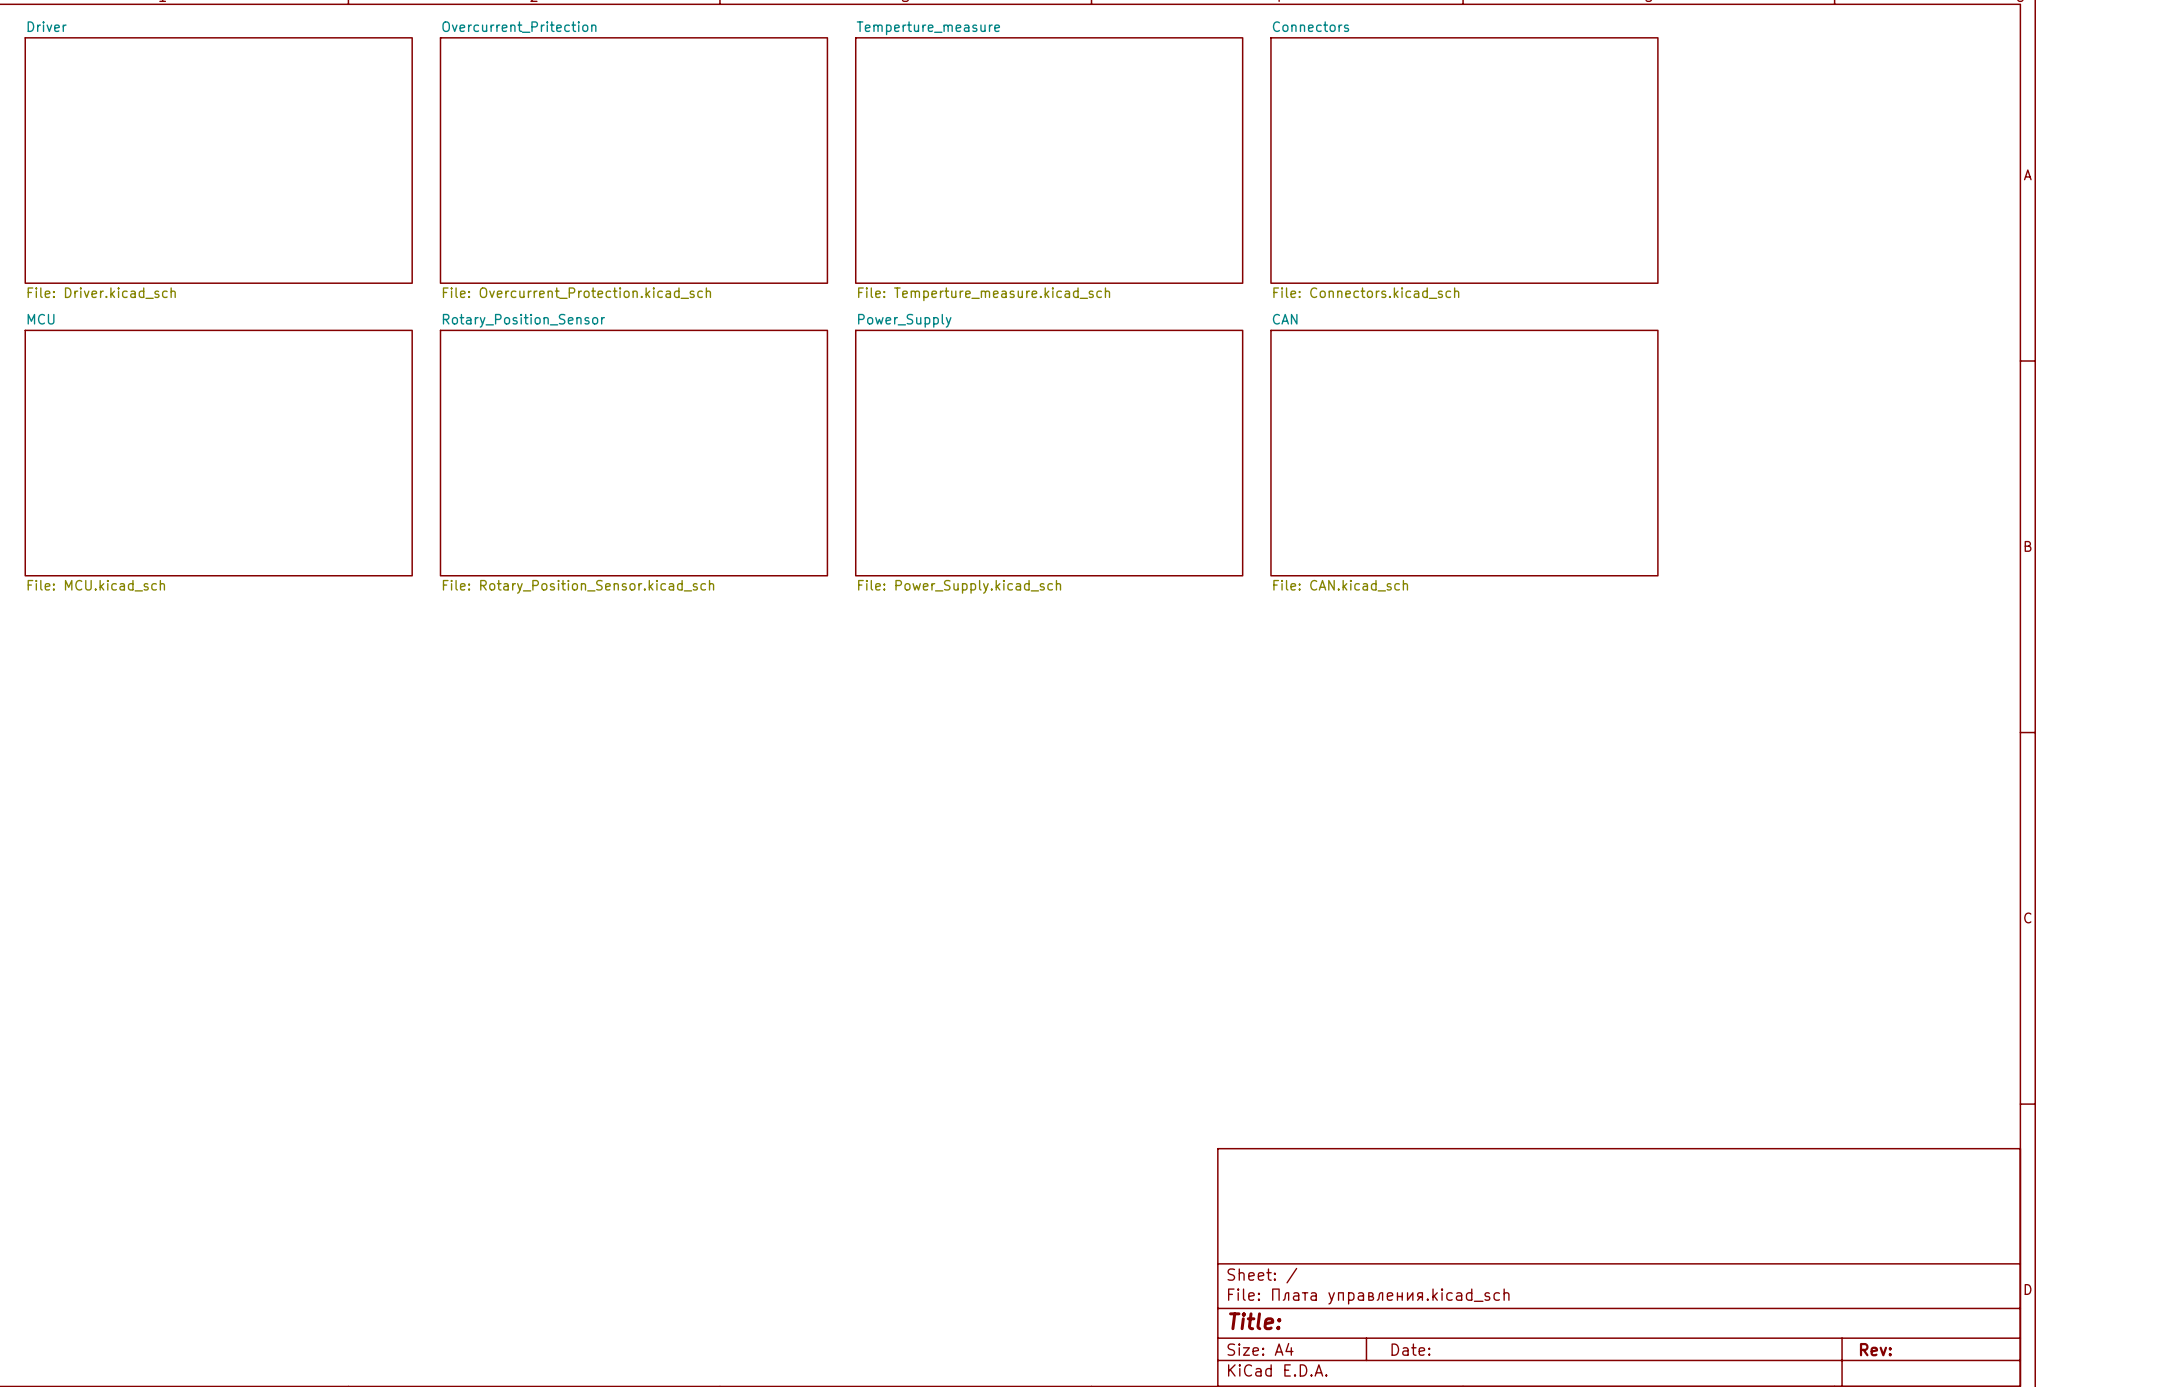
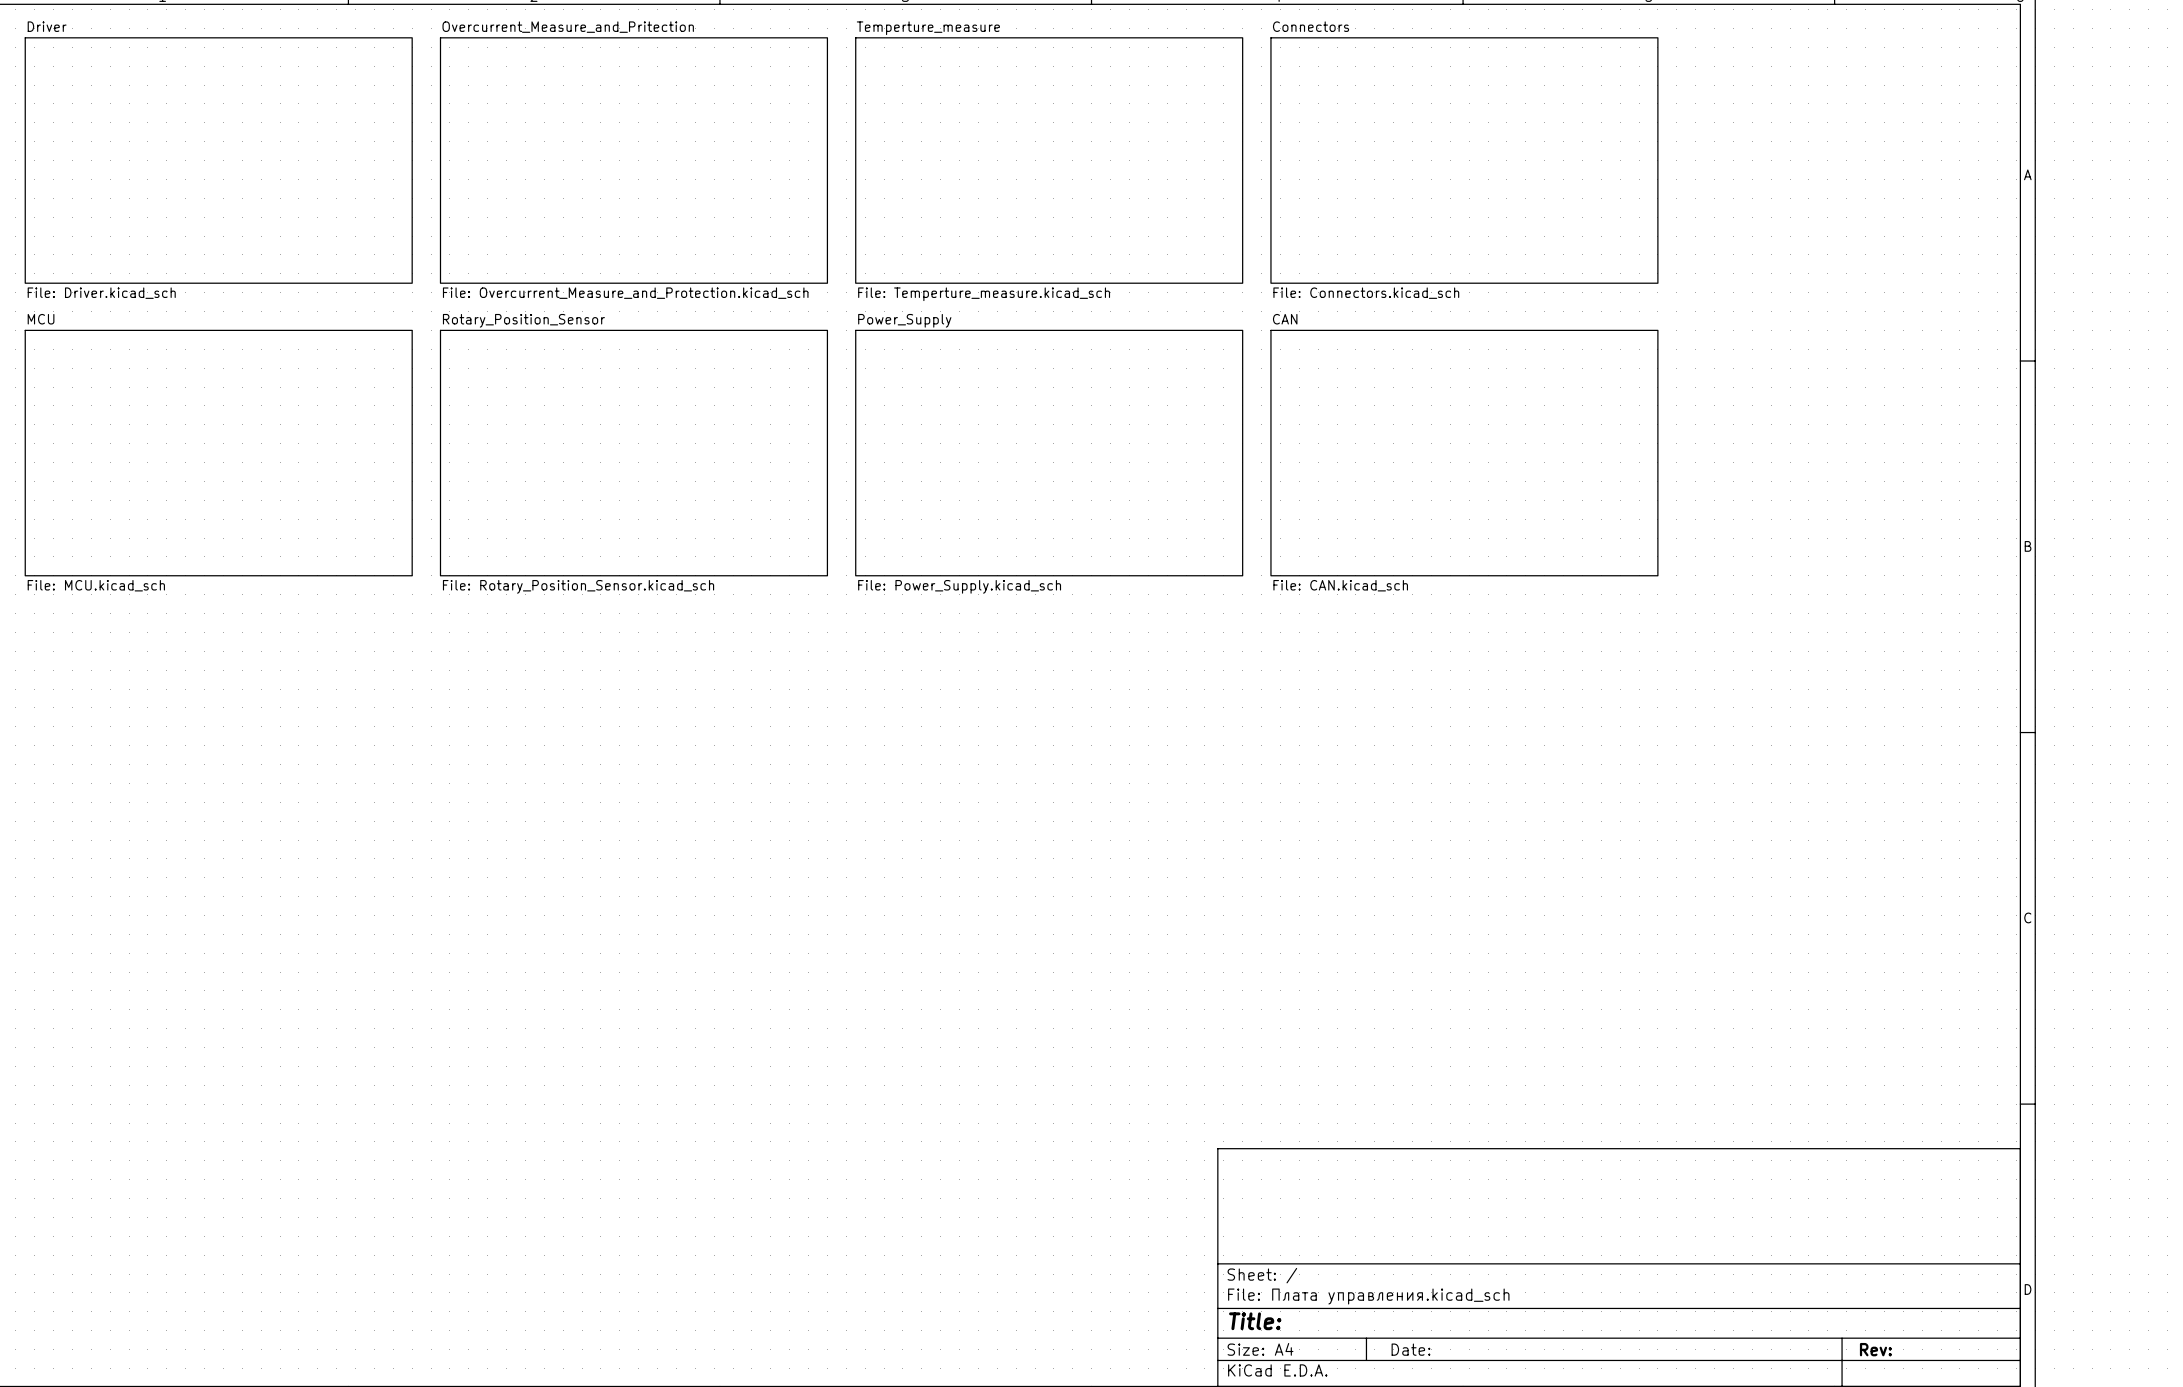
sheet Overcurrent_Pritection name: Overcurrent_Pritection (519, 27) -> Overcurrent_Measure_and_Pritection (568, 27)
sheet Overcurrent_Pritection value: File: Overcurrent_Protection.kicad_sch (576, 293) -> File: Overcurrent_Measure_and_Protection.kicad_sch (625, 293)

